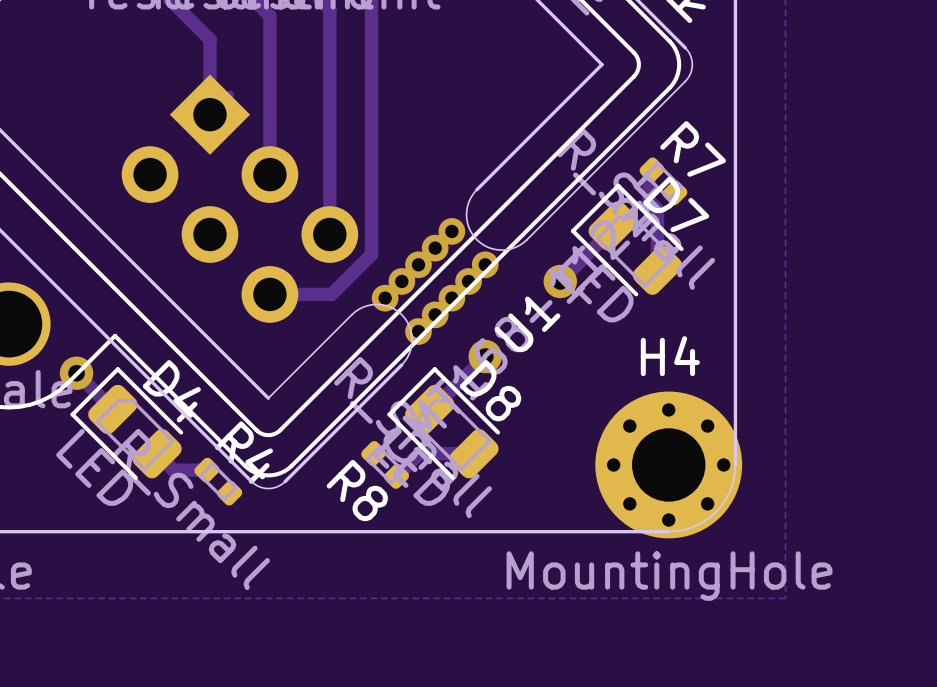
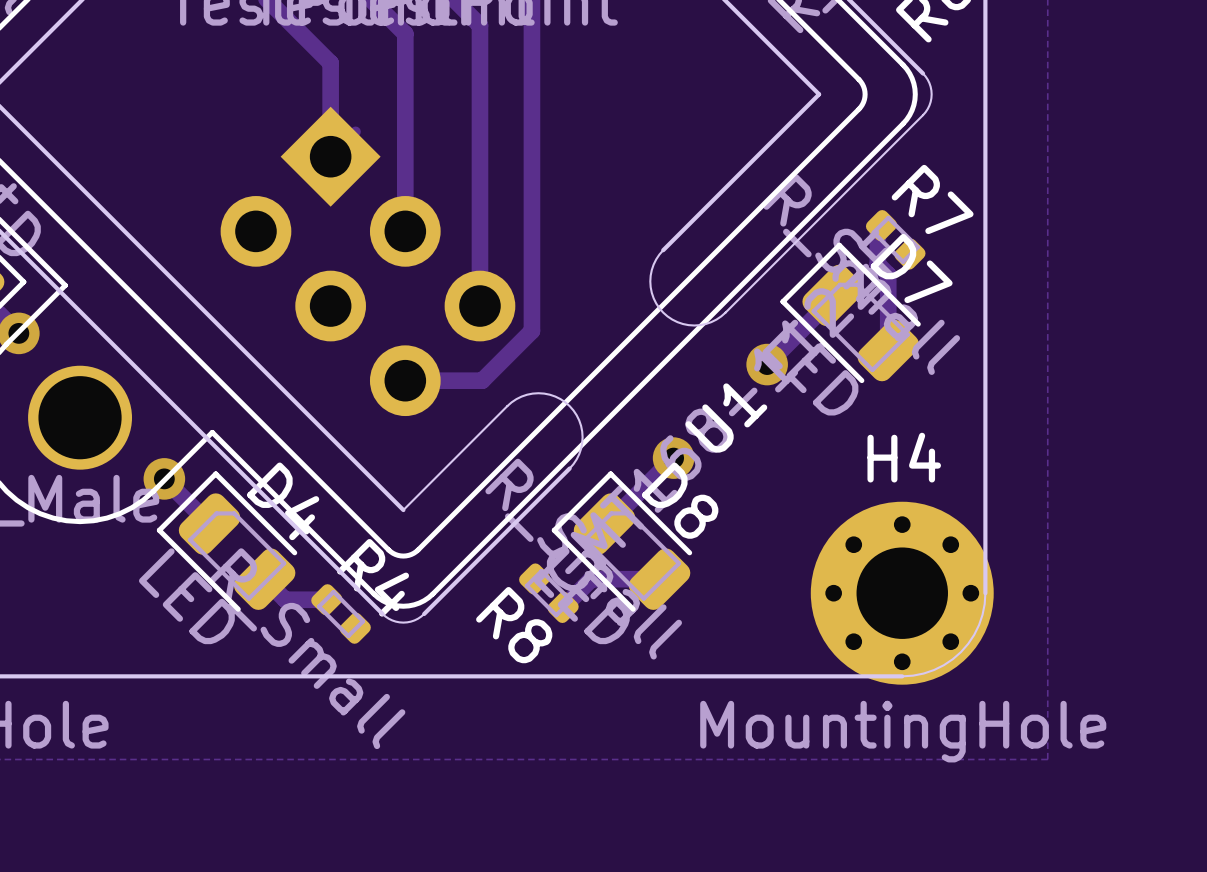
via: (451, 231) -> none
via: (435, 248) -> none
via: (418, 264) -> none
via: (485, 264) -> none
via: (401, 281) -> none
via: (468, 281) -> none
via: (385, 298) -> none
via: (451, 298) -> none
via: (435, 314) -> none
via: (418, 331) -> none

